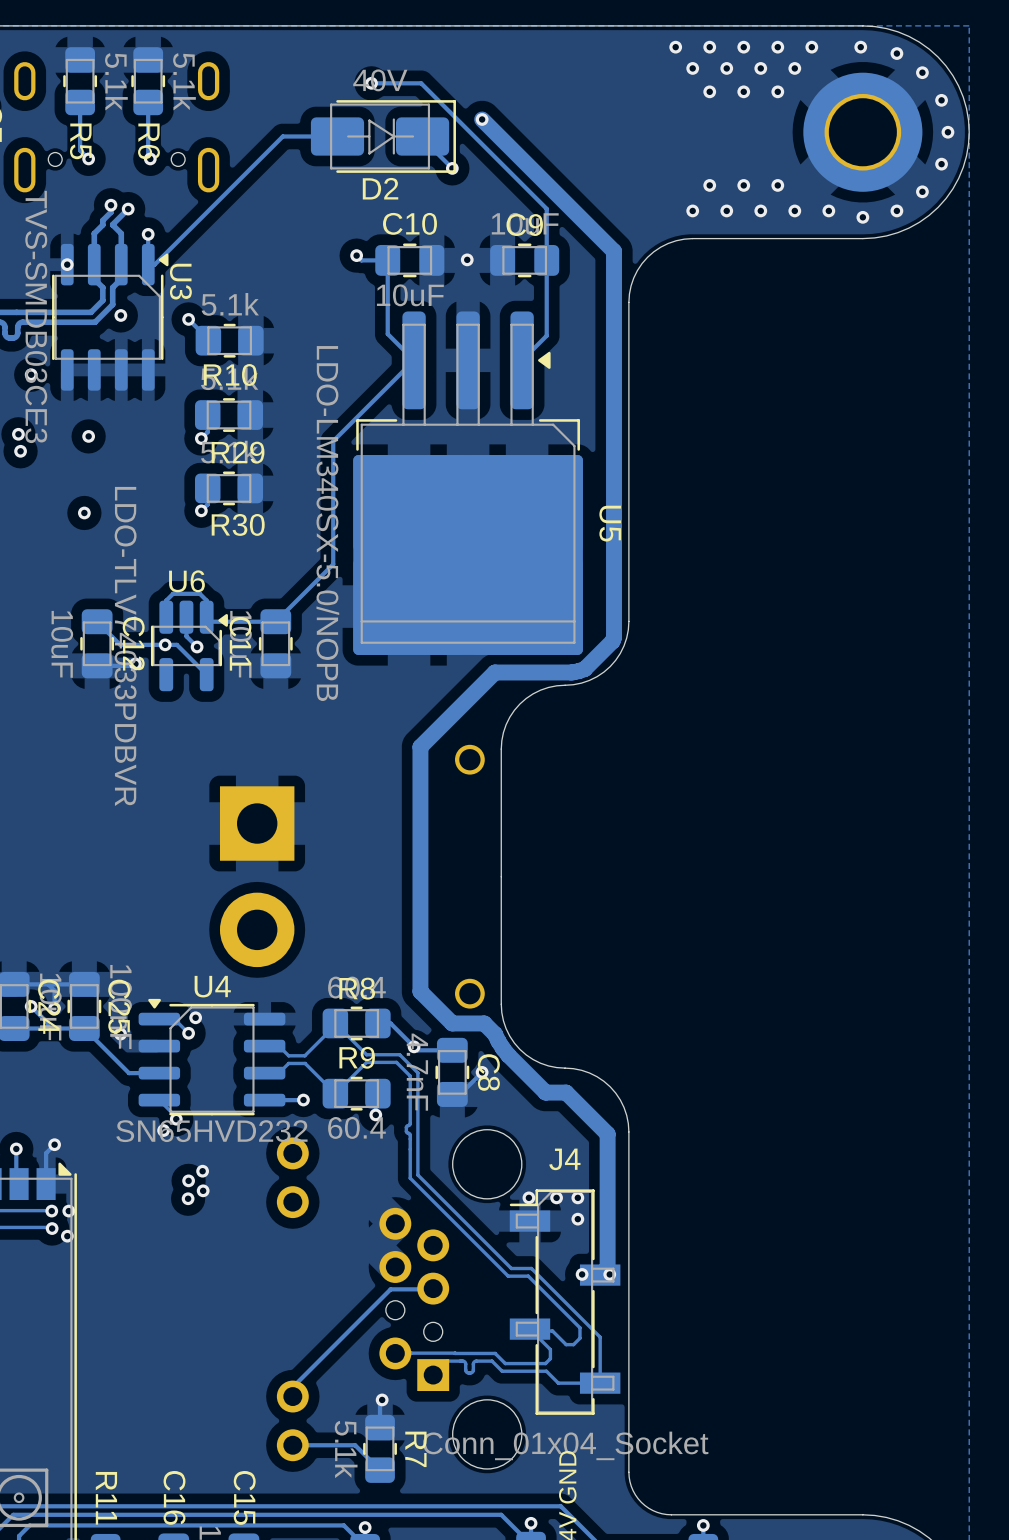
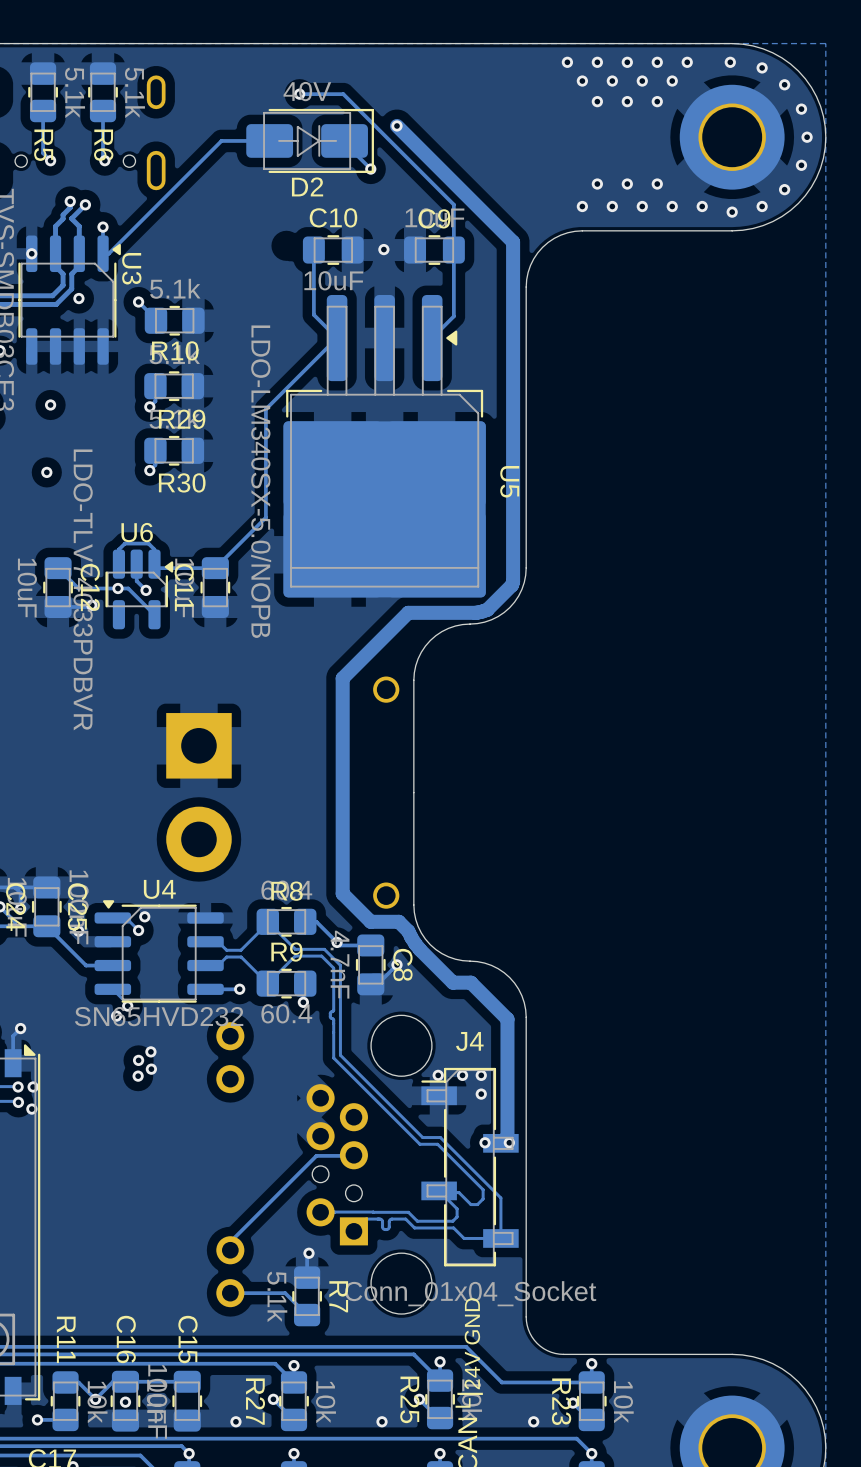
track: (356, 255) (361, 260) (387, 260) -> none
via: (356, 255) -> none

